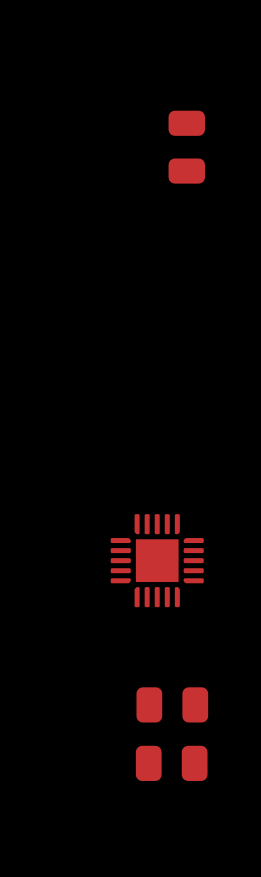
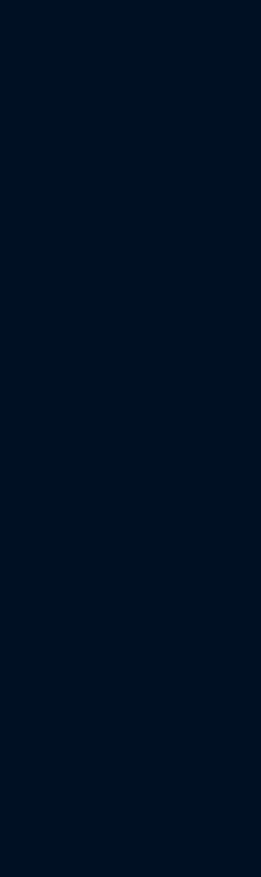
part: (186, 147) -> none
part: (157, 560) -> none
part: (172, 704) -> none
part: (171, 763) -> none

